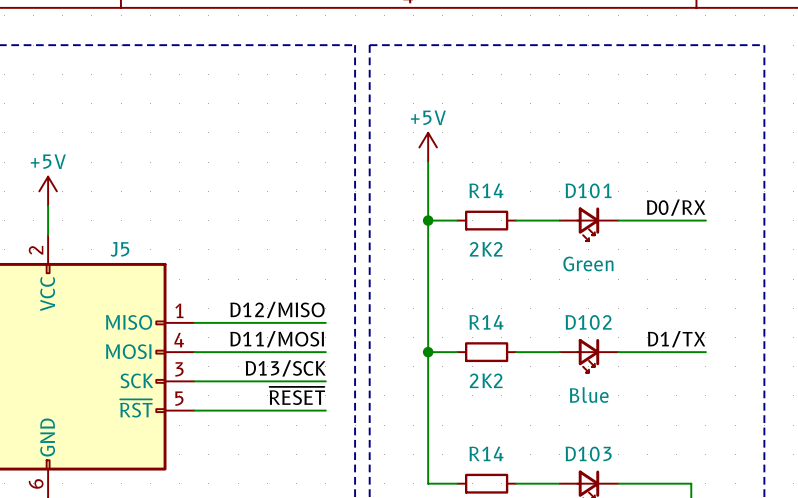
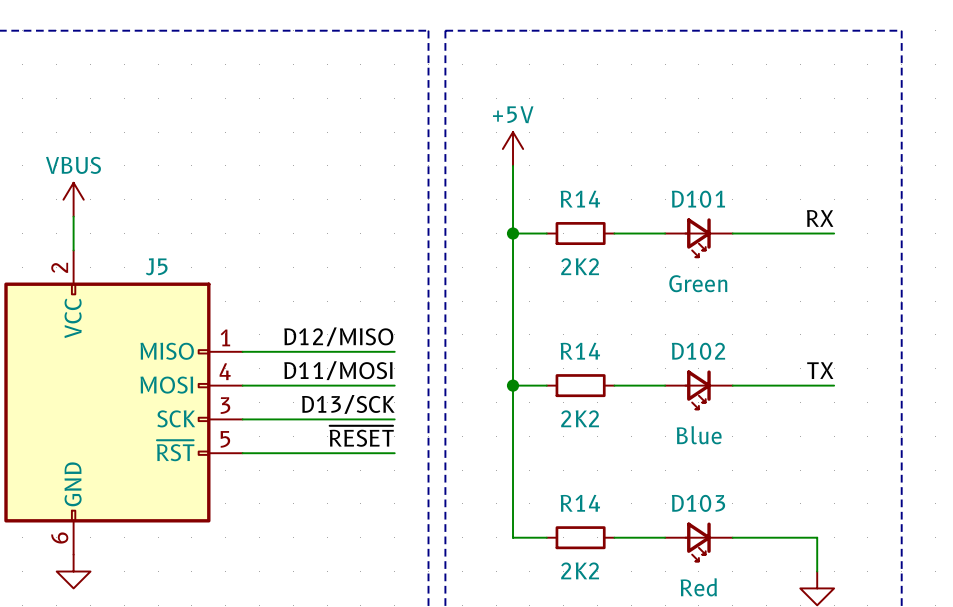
power symbol: +5V (48, 191) -> VBUS (73, 199)
label: D0/RX (676, 207) -> RX (820, 218)
label: D1/TX (676, 339) -> TX (820, 370)

